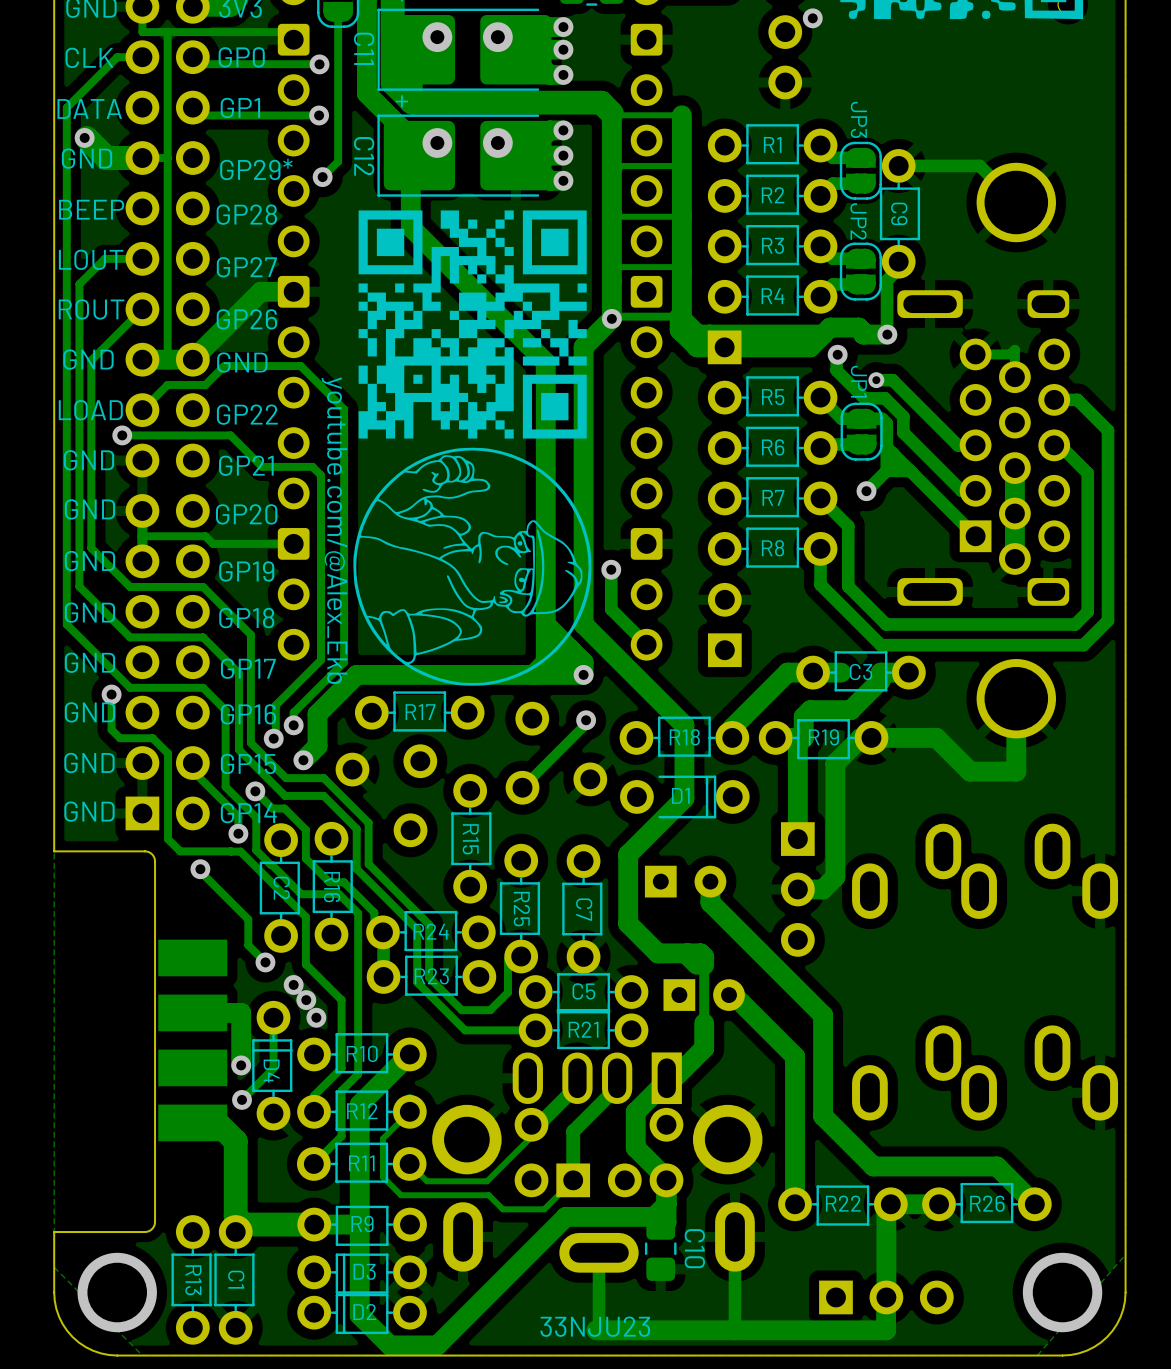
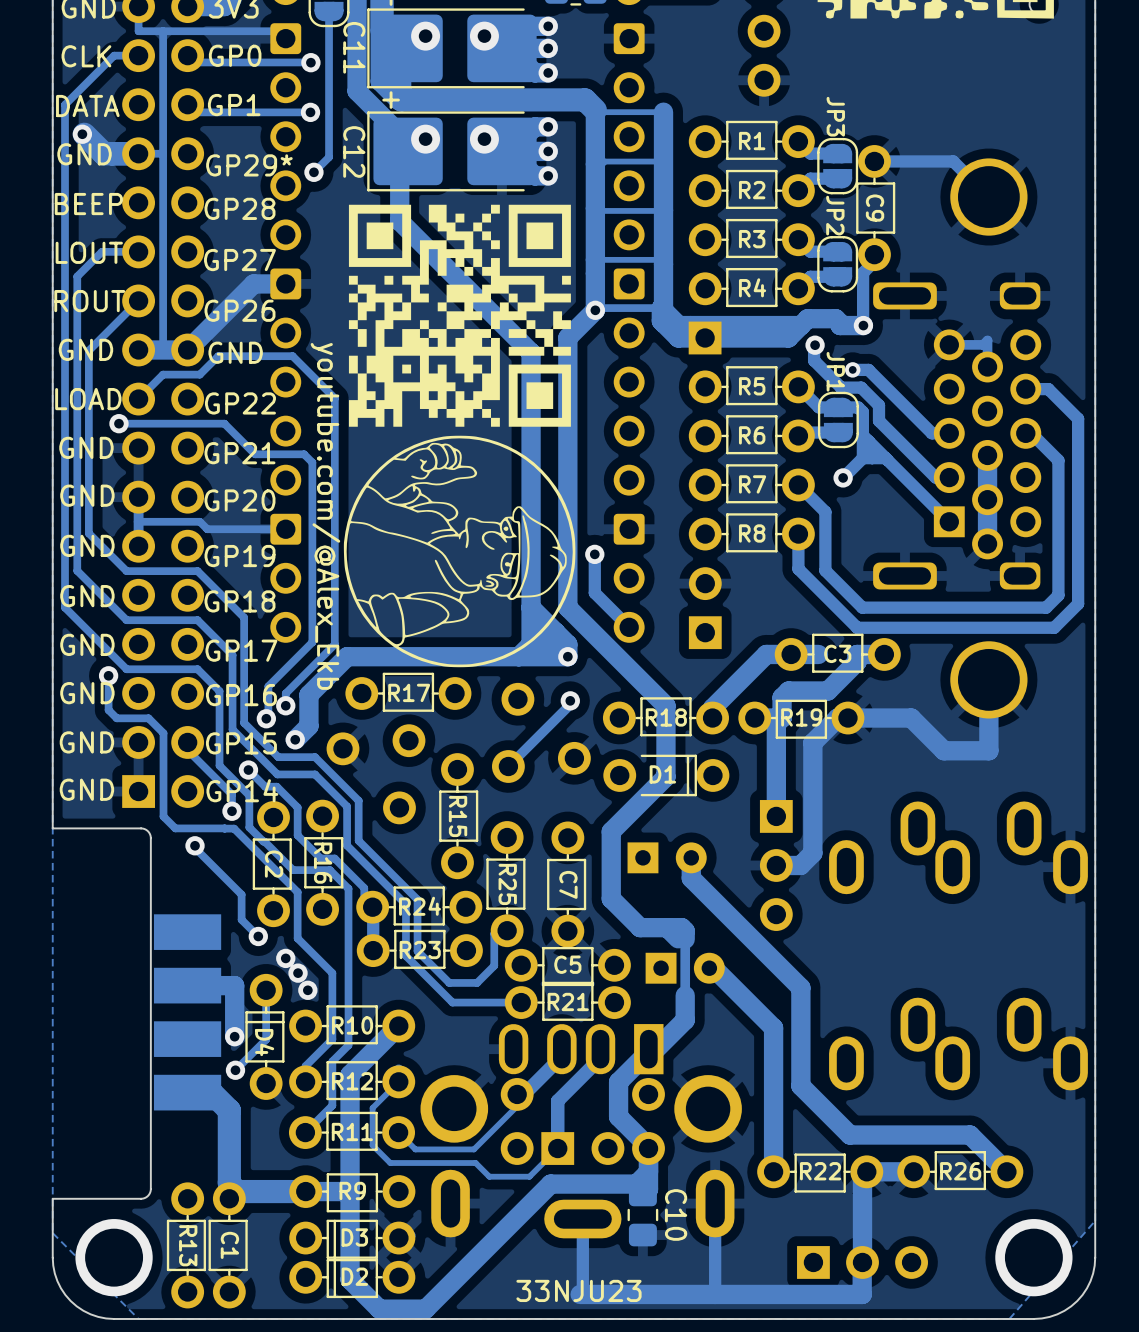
via: (812, 18) -> none

